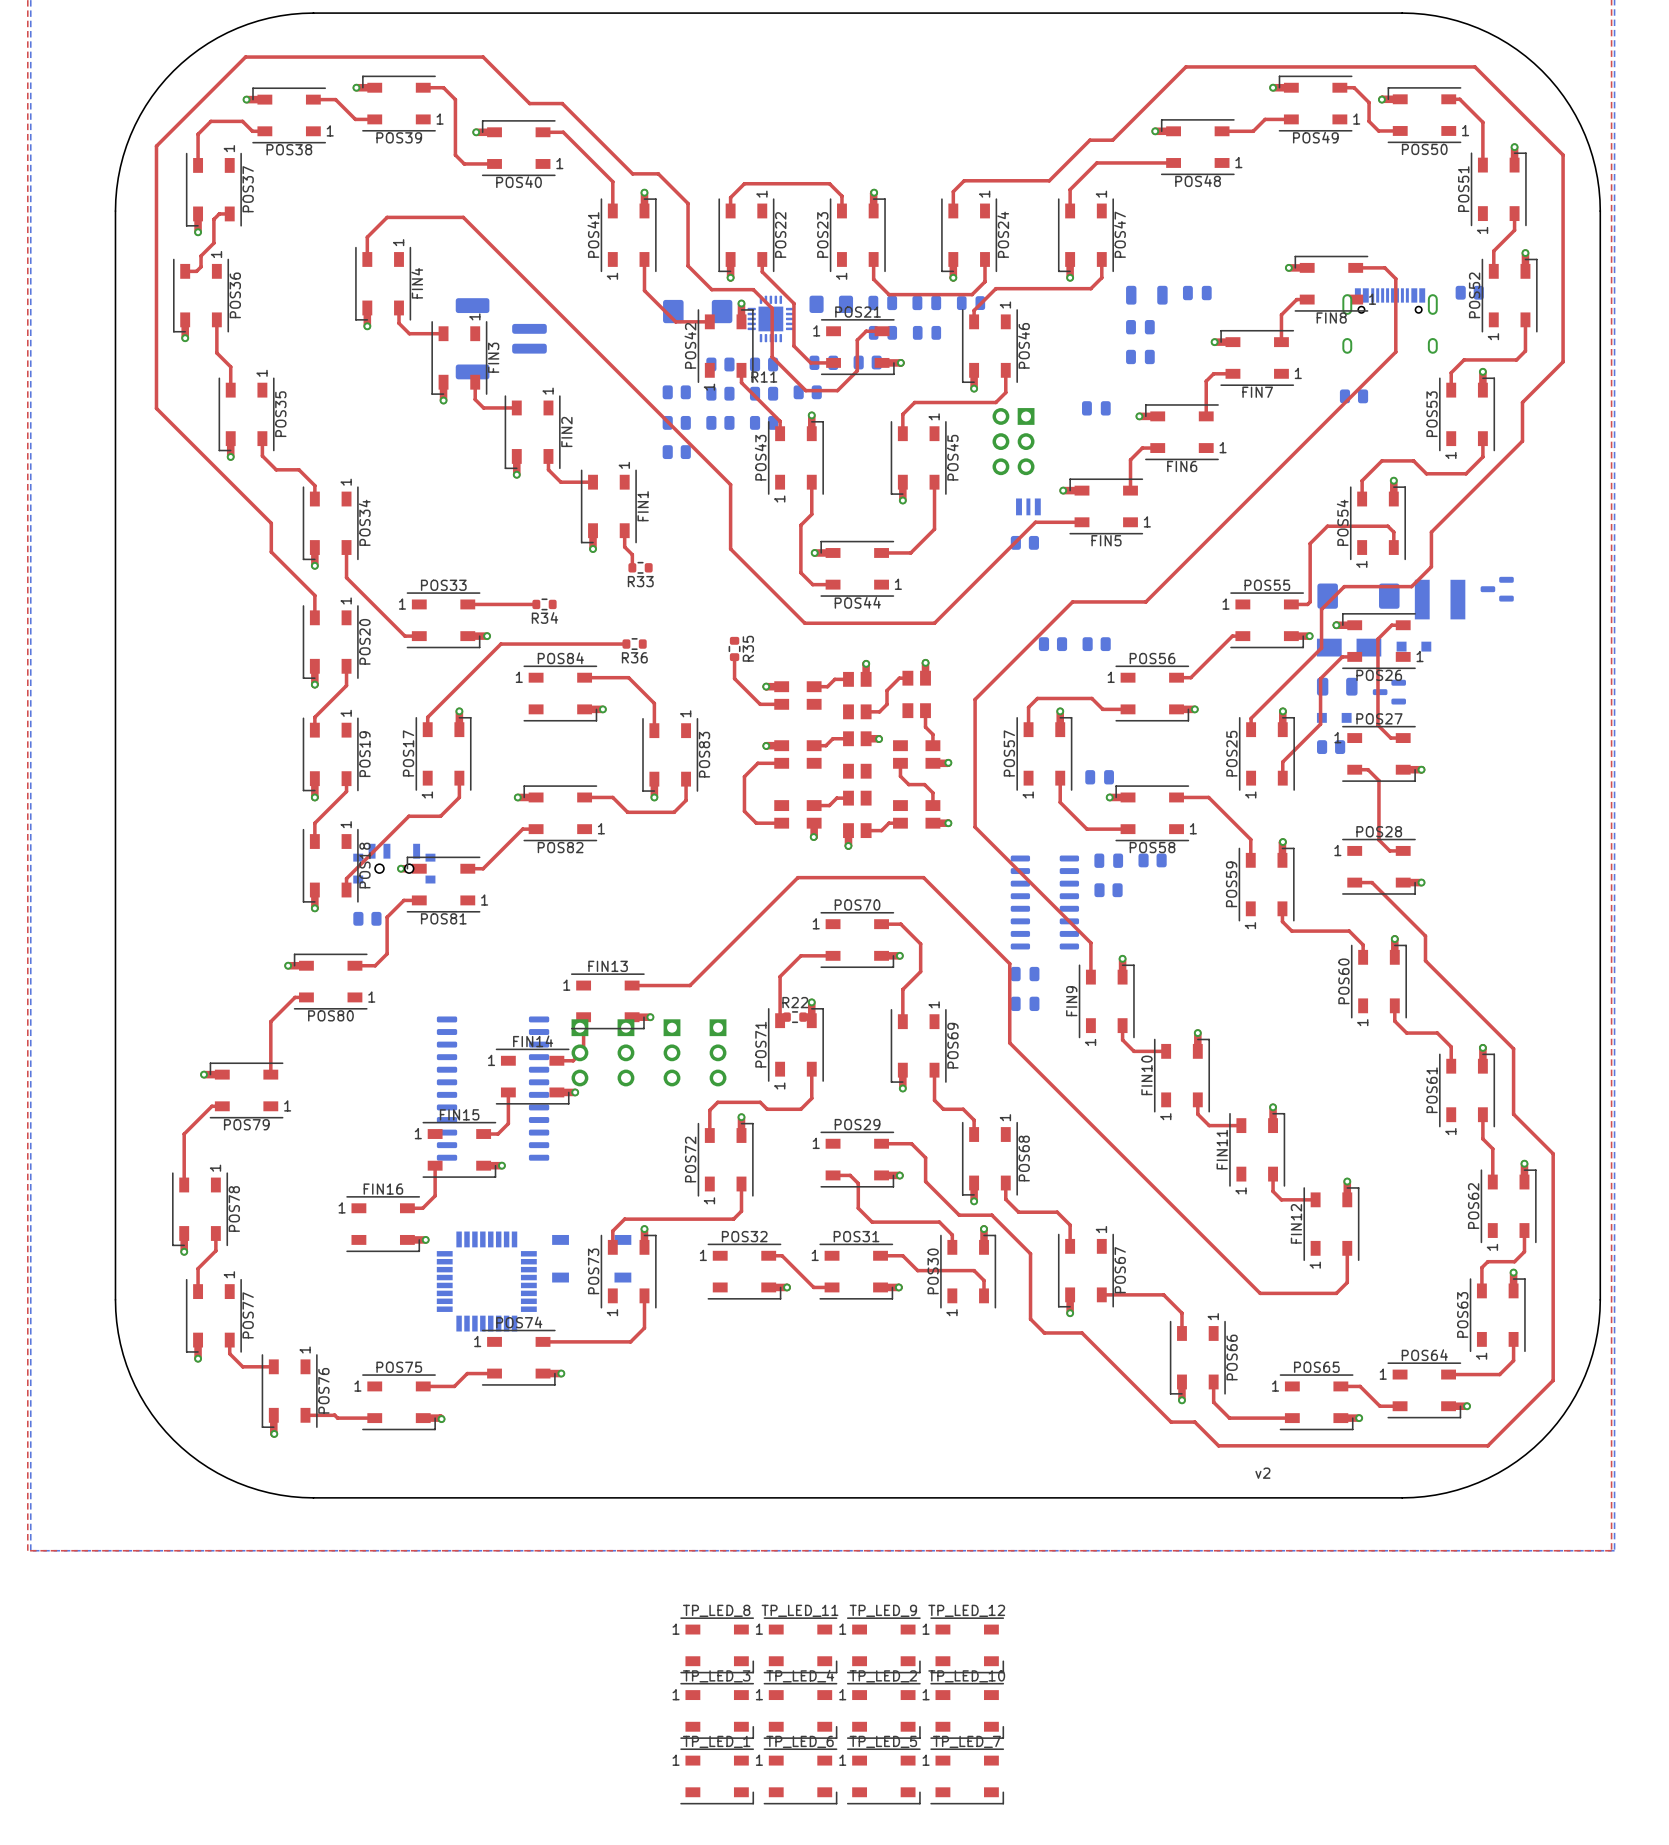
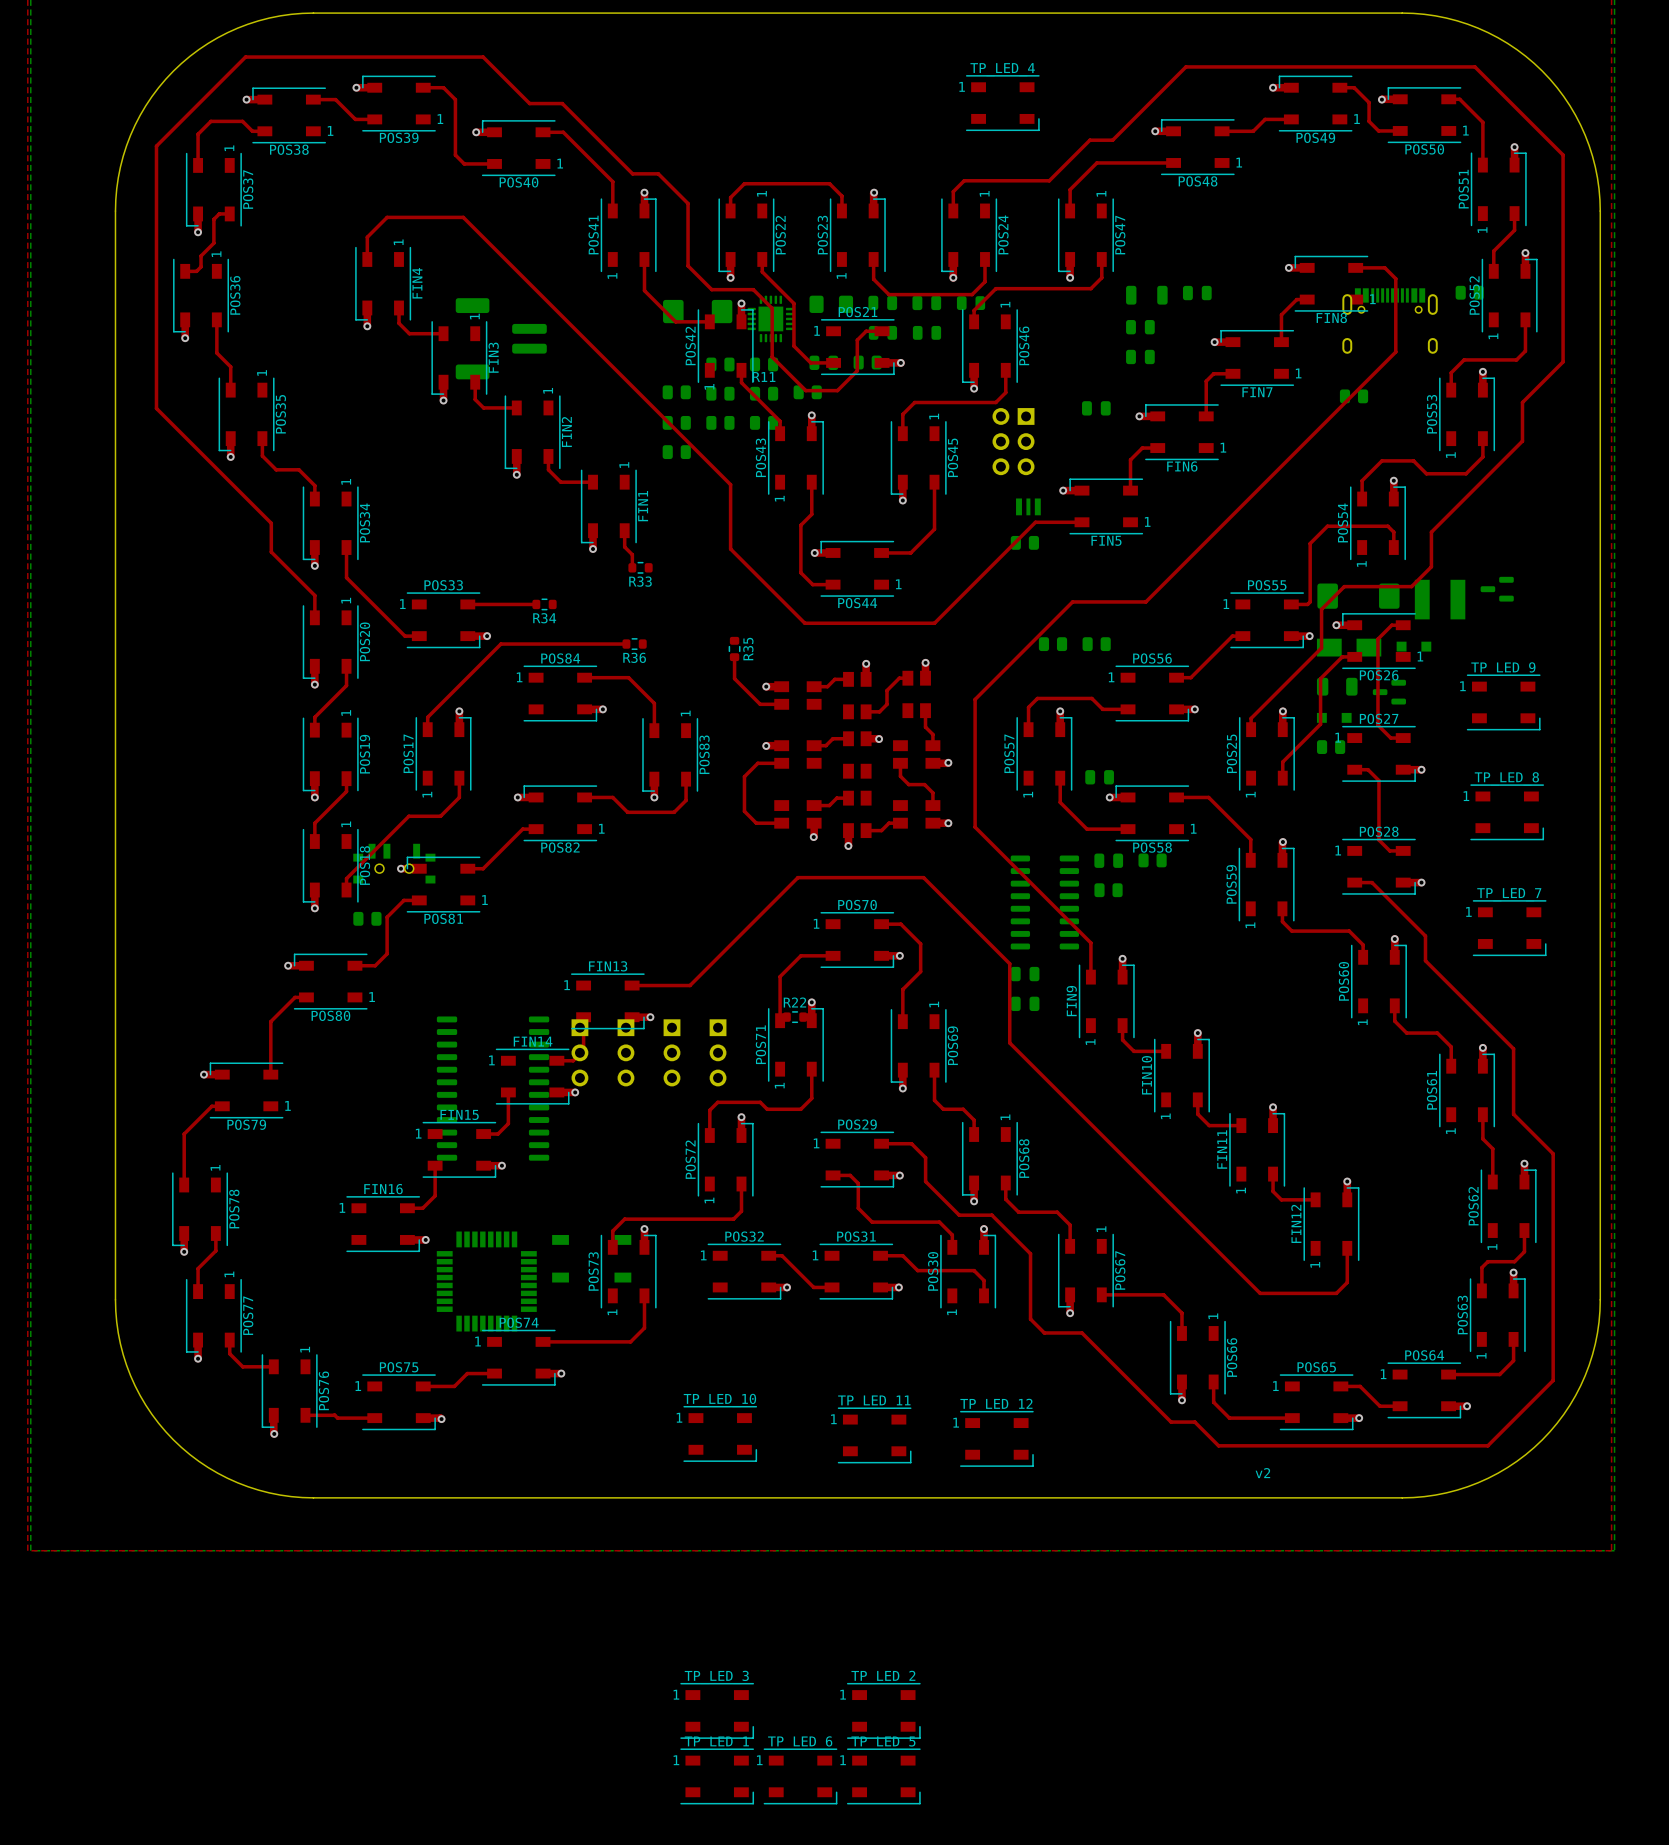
TP_LED_8 position: (717, 1645) -> (1507, 812)
TP_LED_11 position: (800, 1645) -> (874, 1435)
TP_LED_9 position: (883, 1645) -> (1503, 702)
TP_LED_12 position: (967, 1645) -> (996, 1438)
TP_LED_4 position: (800, 1710) -> (1002, 103)
TP_LED_10 position: (967, 1710) -> (720, 1433)
TP_LED_7 position: (967, 1776) -> (1509, 928)

